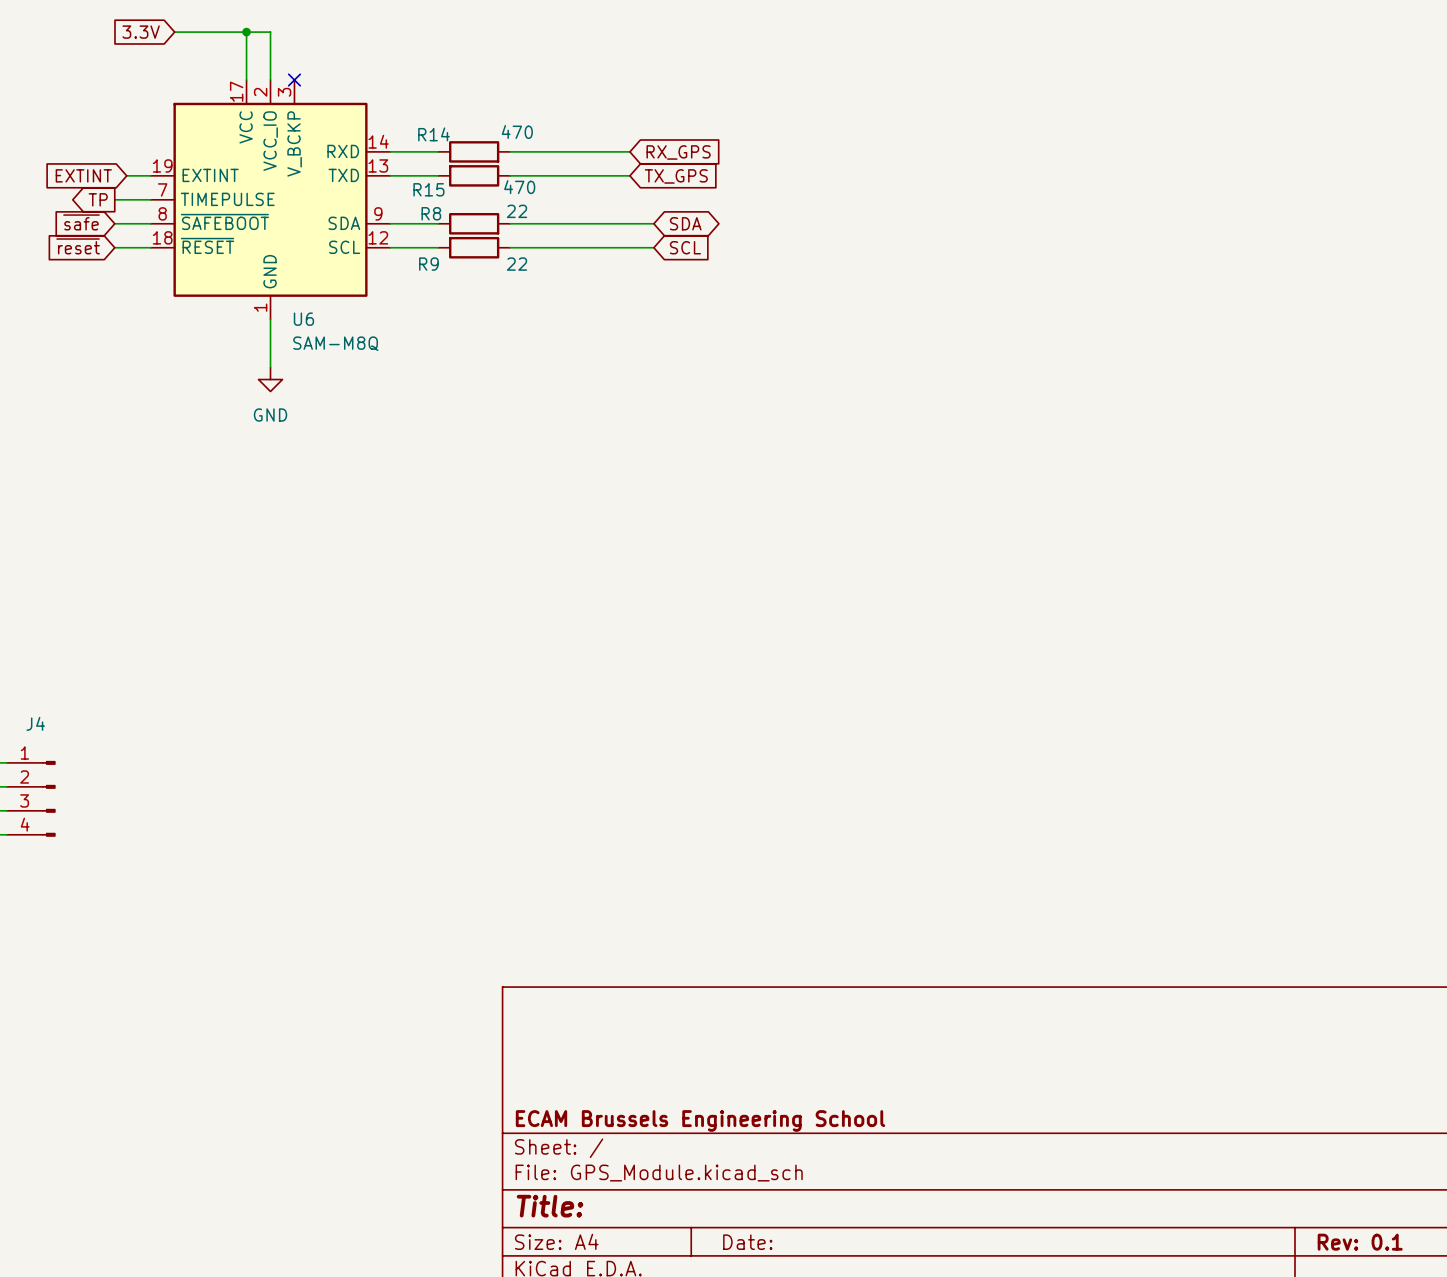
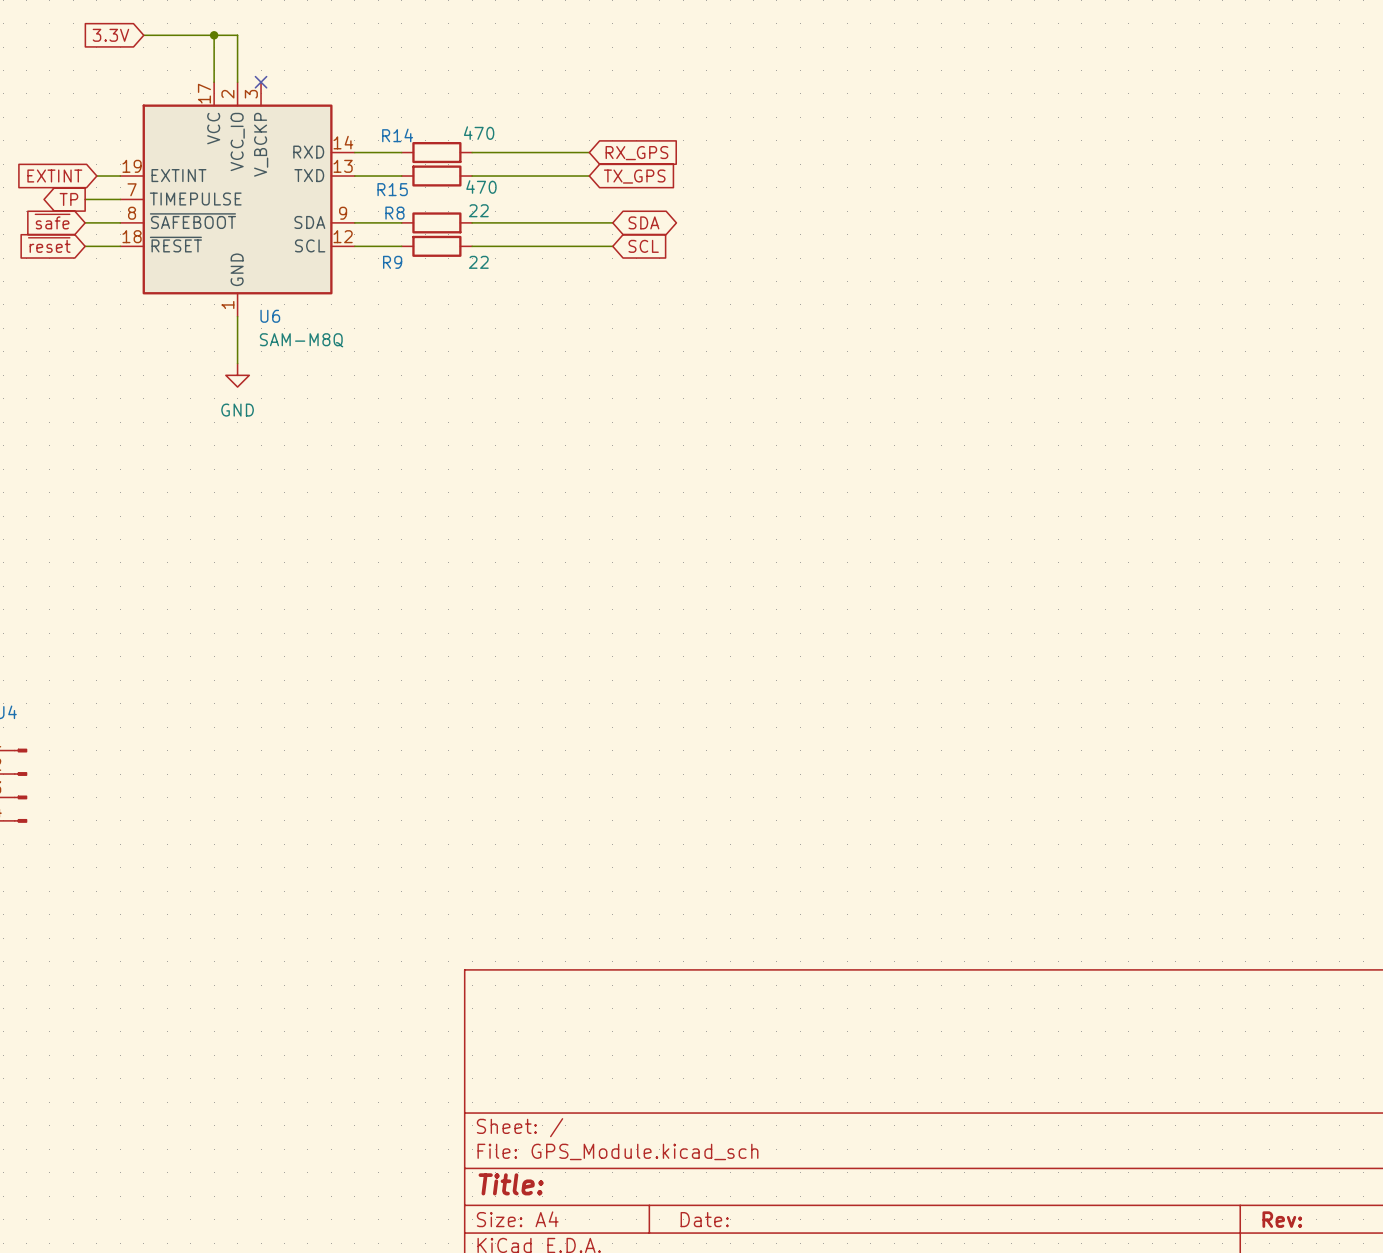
title block: ECAM Brussels Engineering School (700, 1120) -> none
title block: Rev: 0.1 (1360, 1242) -> Rev: (1282, 1219)

